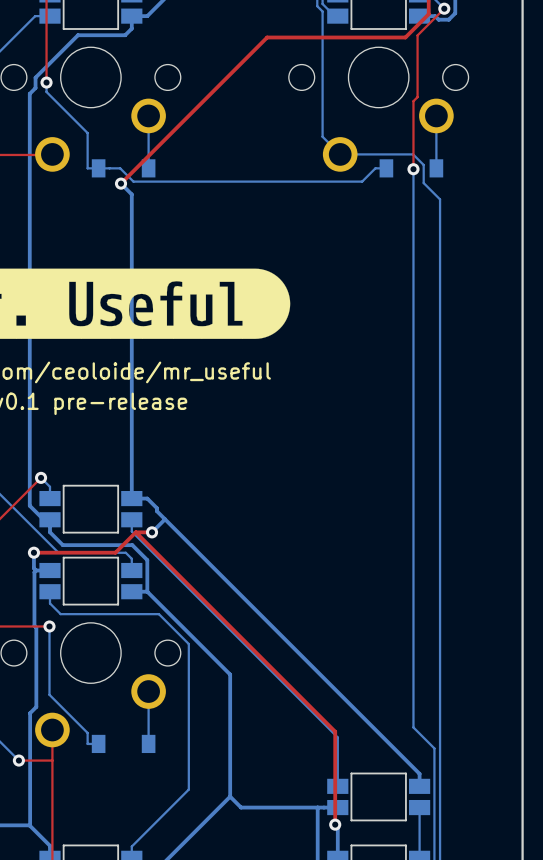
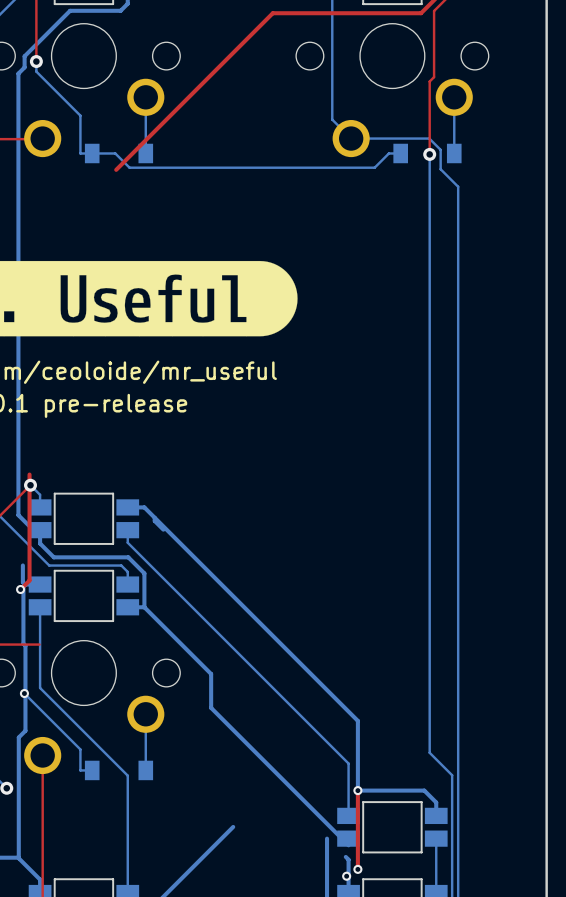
bottom track: (121, 183) (131, 194) (131, 498) -> none
via: (121, 183) -> none
top track: none -> (29, 474) (29, 580) (20, 589)
top track: (135, 532) (152, 532) -> none
top track: (135, 532) (335, 731) (335, 824) -> none
top track: (135, 532) (115, 552) (33, 552) -> none
bottom track: (152, 532) (165, 519) (408, 762) -> (154, 517) (357, 720) (357, 790) (424, 790)
via: (152, 532) -> none
via: (33, 552) -> none
via: none -> (20, 589)
bottom track: (50, 603) (60, 614) (158, 614) (188, 644) (188, 789) (131, 846) -> (40, 619) (40, 688) (127, 775) (127, 880)
bottom track: (49, 626) (49, 694) (87, 732) -> (24, 693) (80, 749) (80, 758)
via: (49, 626) -> none
bottom track: (209, 653) (230, 674) (230, 796) (241, 807) (337, 807) -> (211, 674) (211, 707) (348, 845)
via: none -> (24, 693)
top track: (18, 760) (52, 760) -> none
top track: none -> (357, 790) (357, 869)
via: none -> (357, 790)
via: (335, 824) -> none
via: none -> (357, 869)
via: none -> (346, 876)

